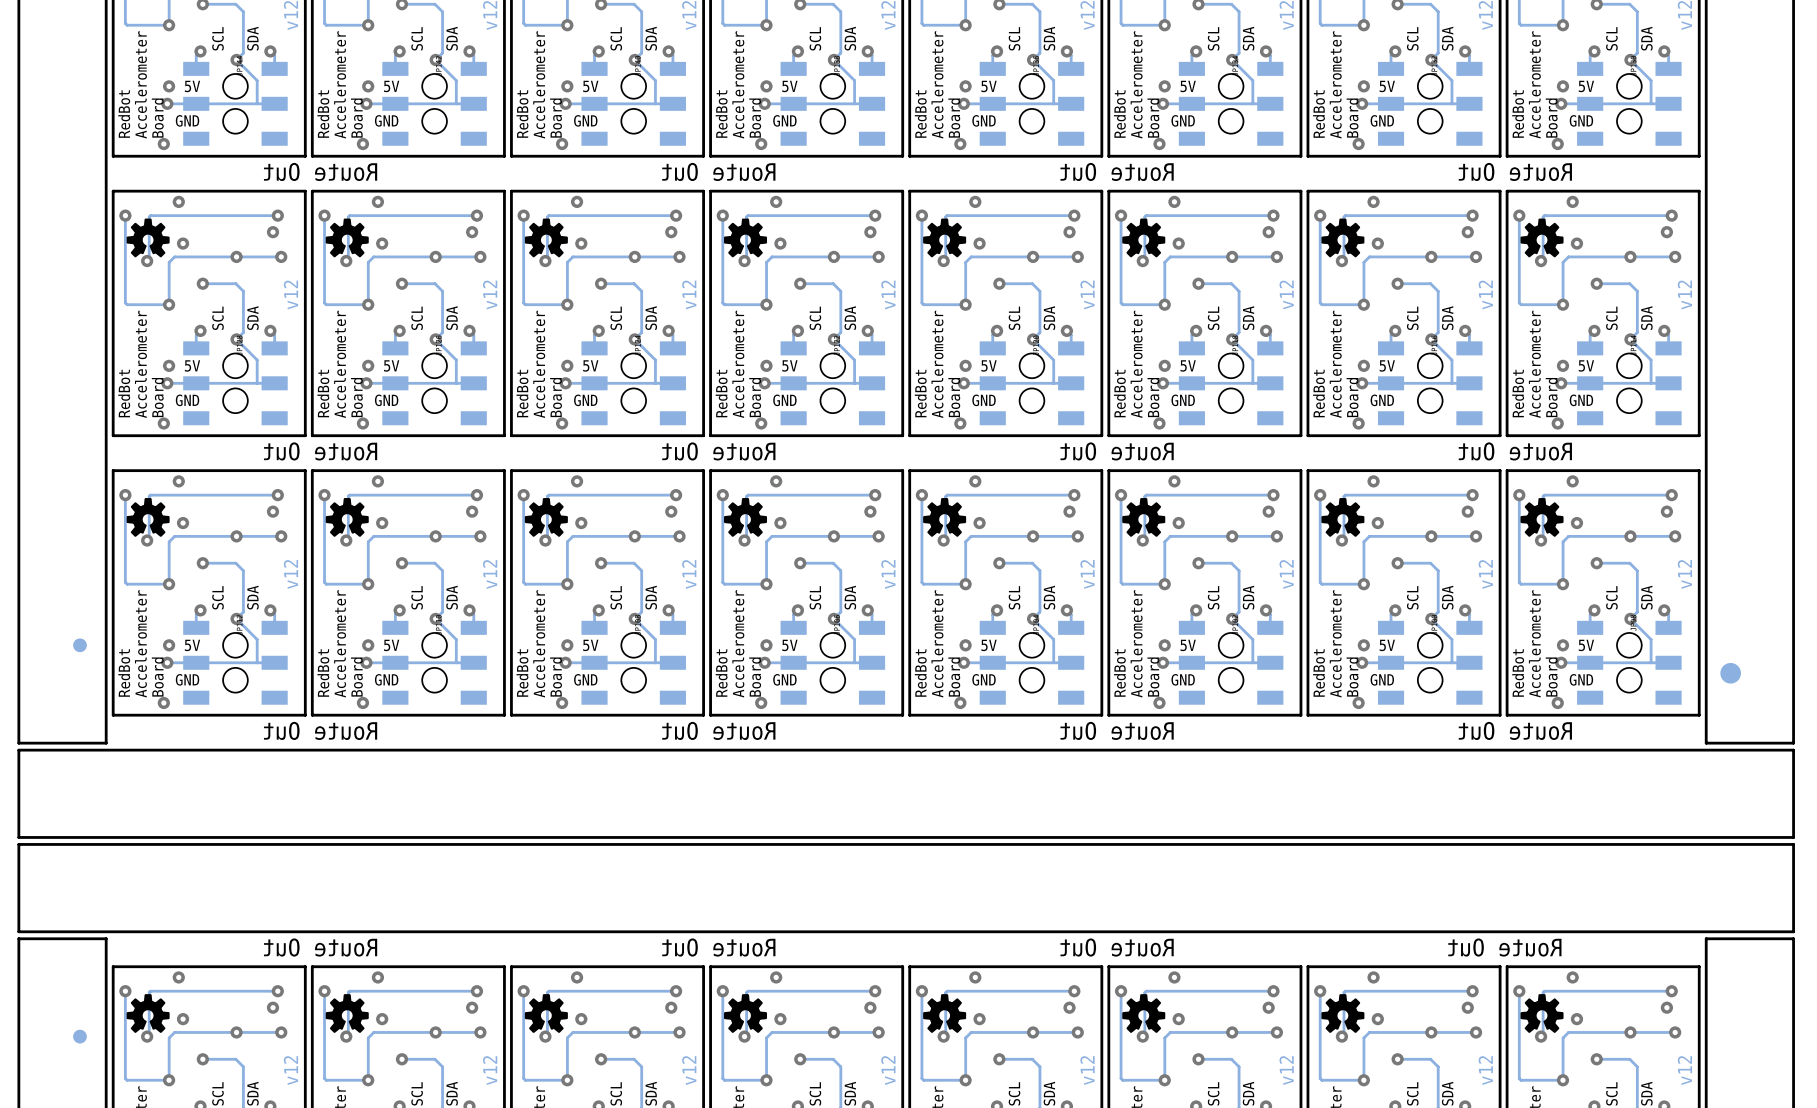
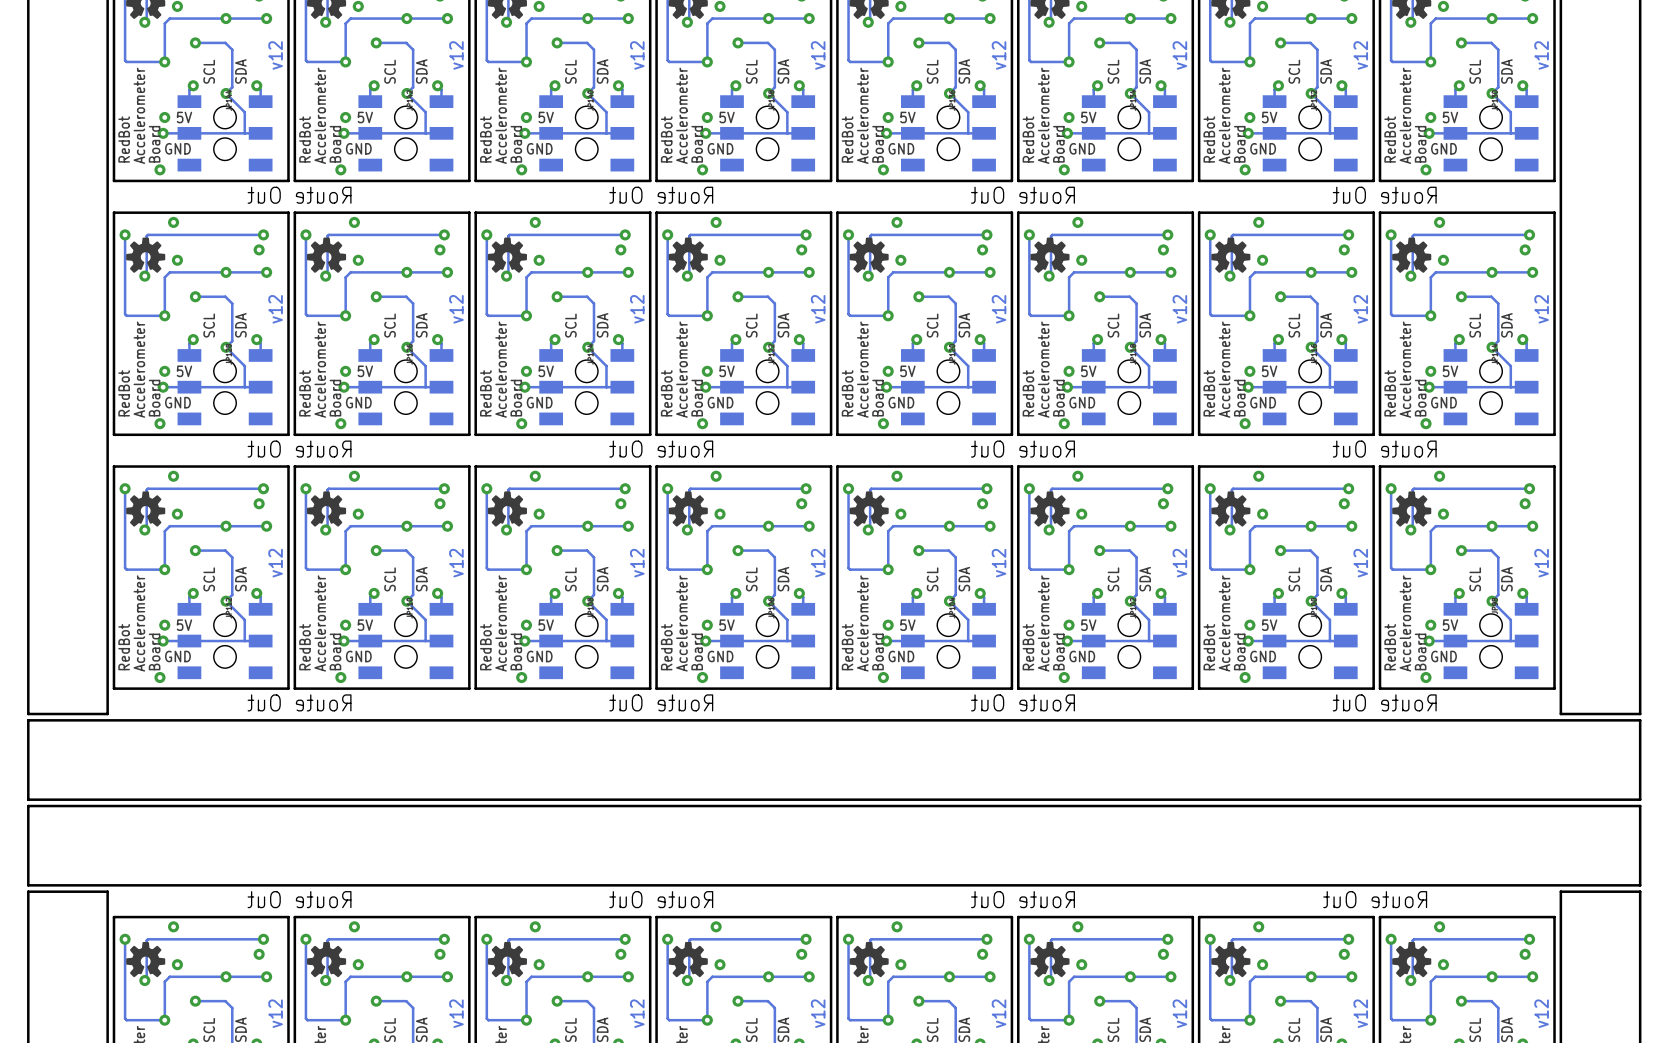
part: (79, 645) -> none
part: (1730, 673) -> none
part: (79, 1036) -> none

